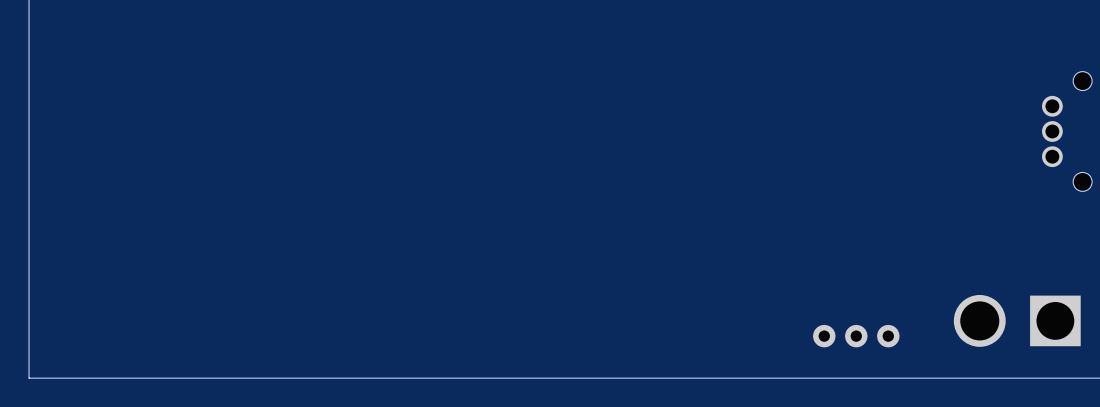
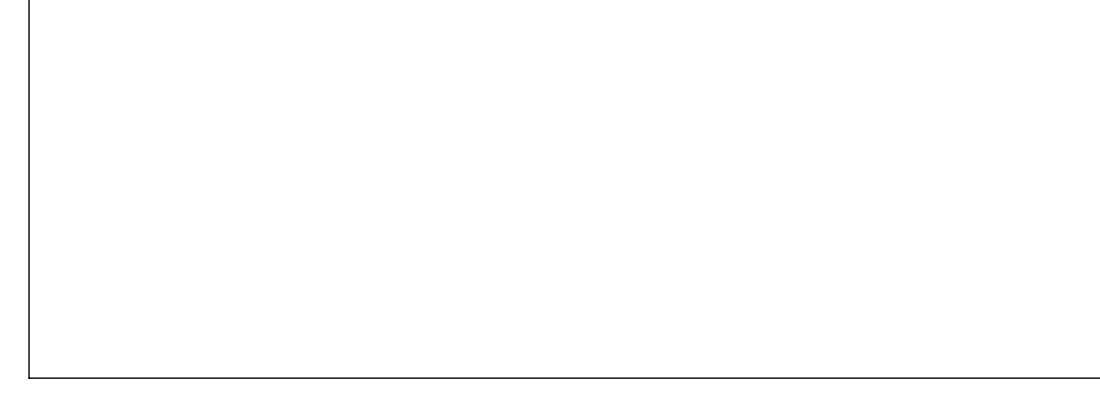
part: (1067, 131) -> none
part: (1017, 320) -> none
part: (856, 336) -> none

